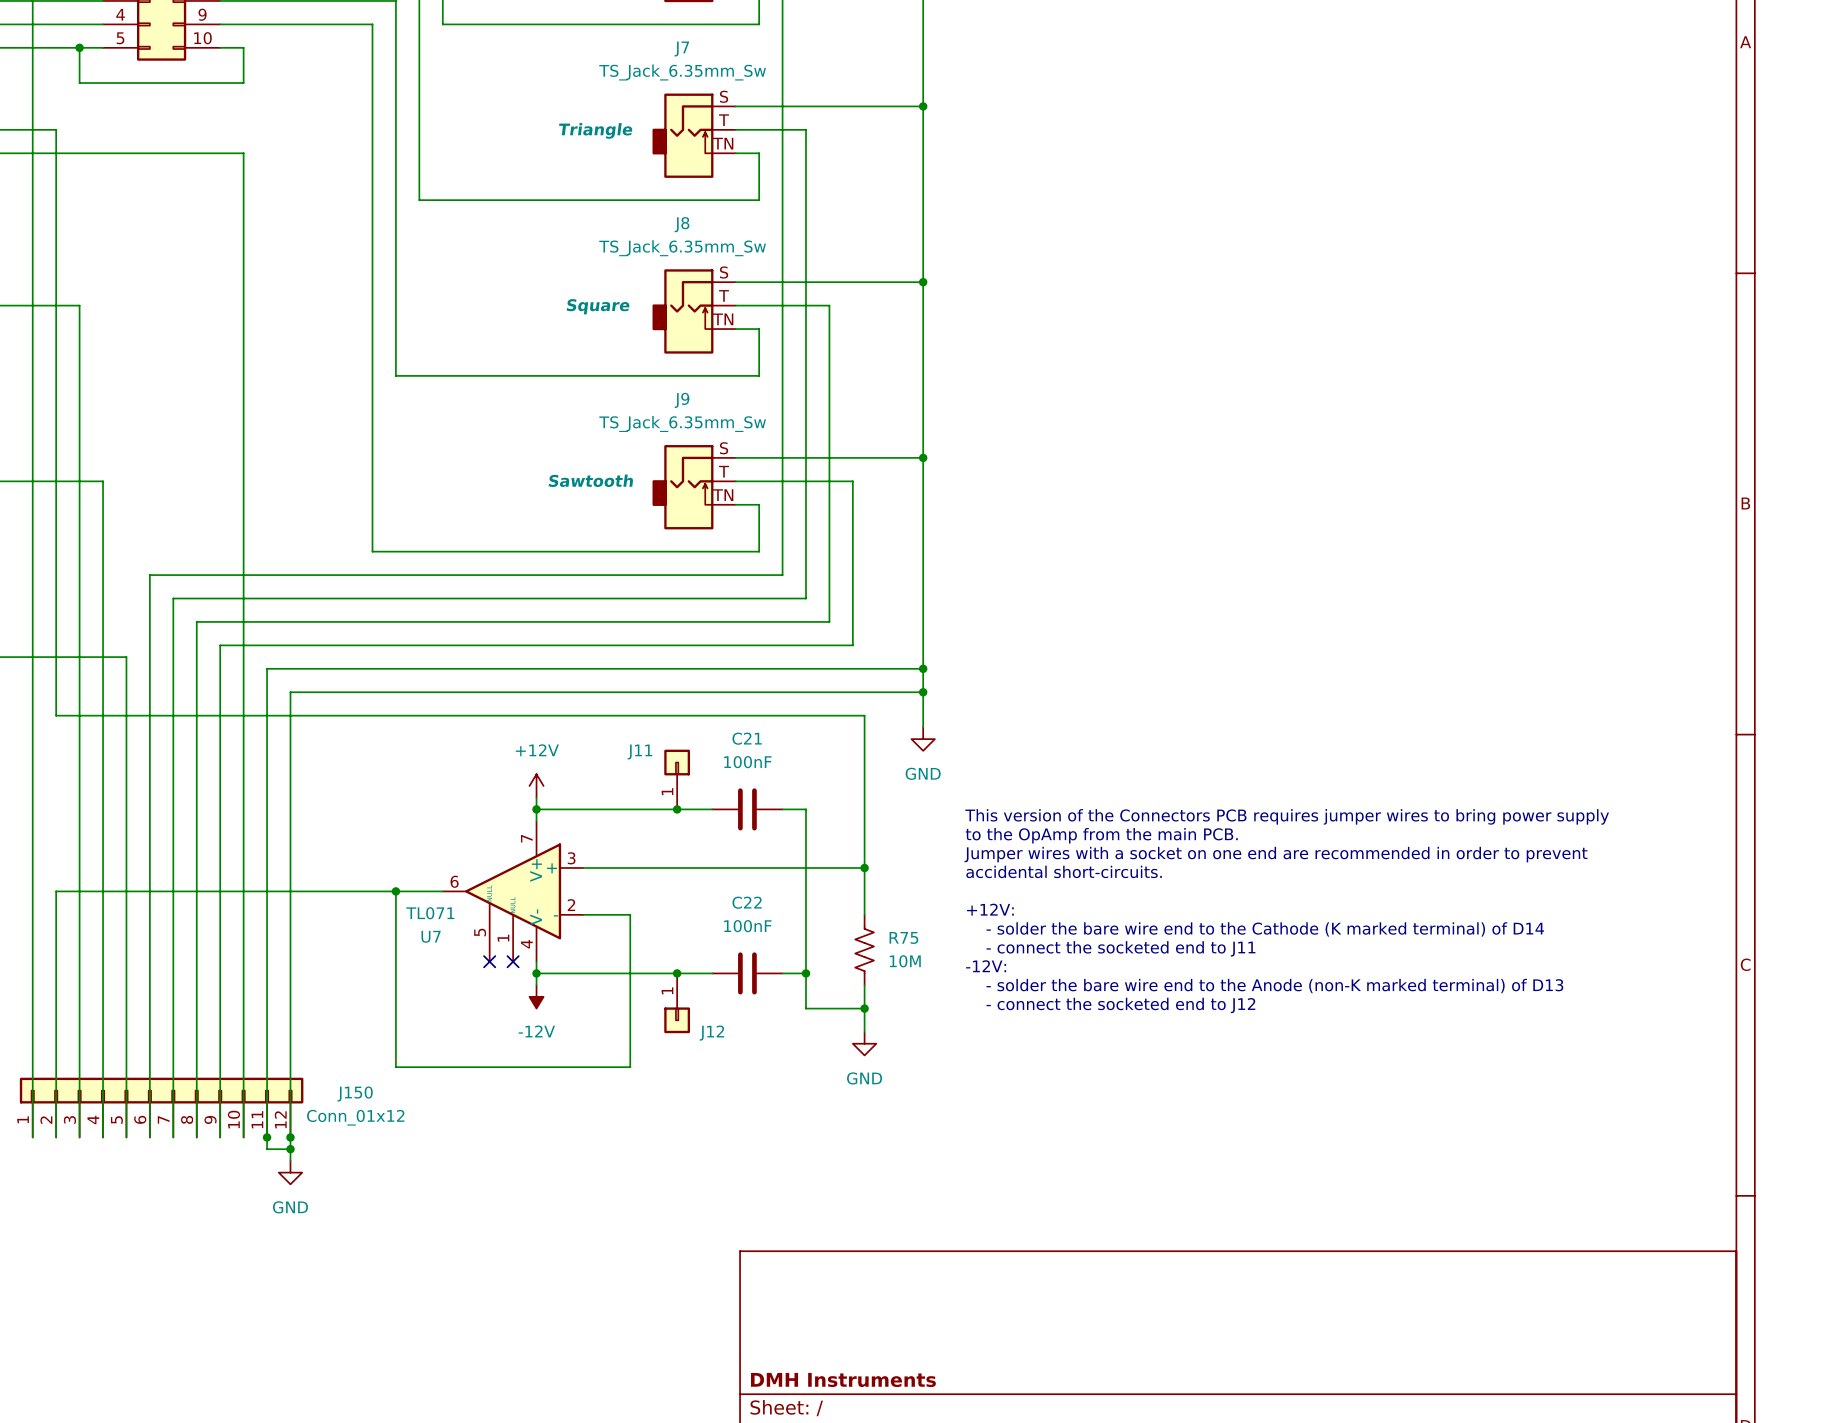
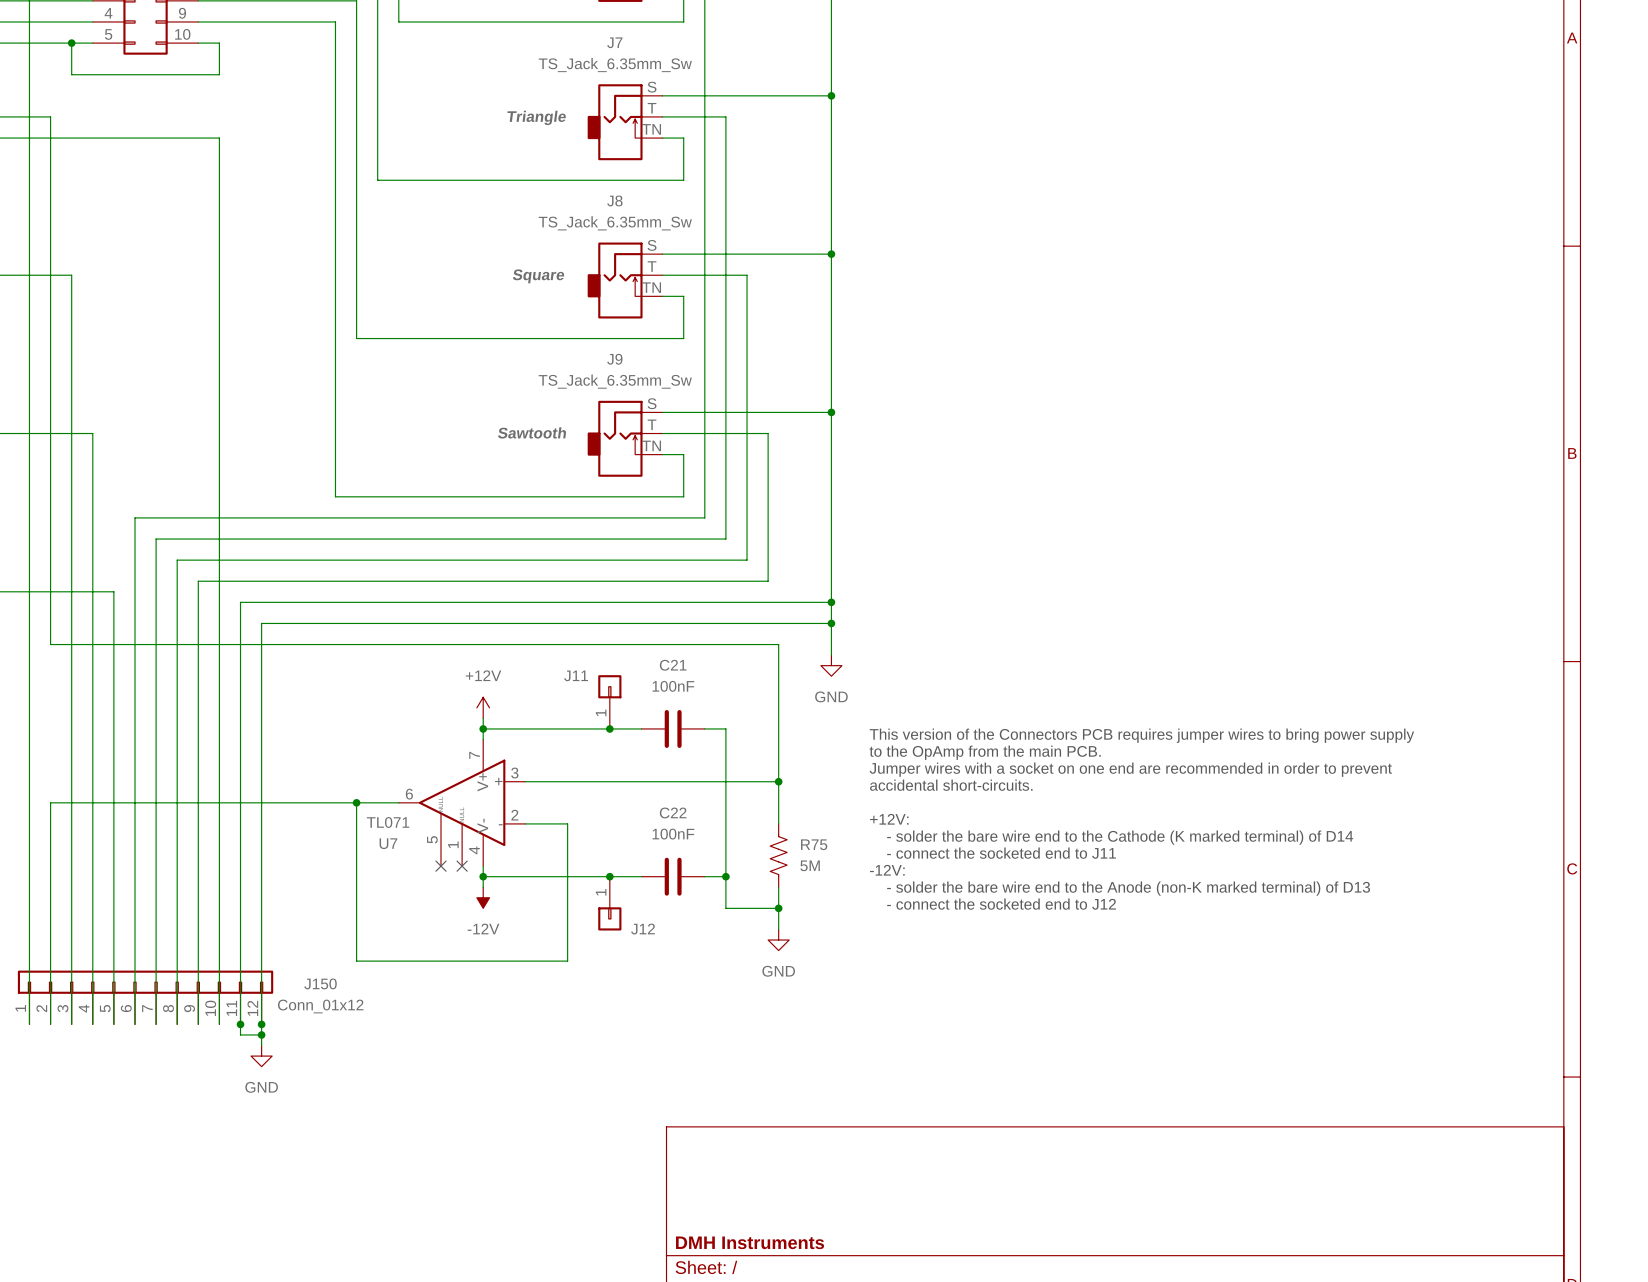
R75 value: 10M (905, 961) -> 5M (810, 865)

